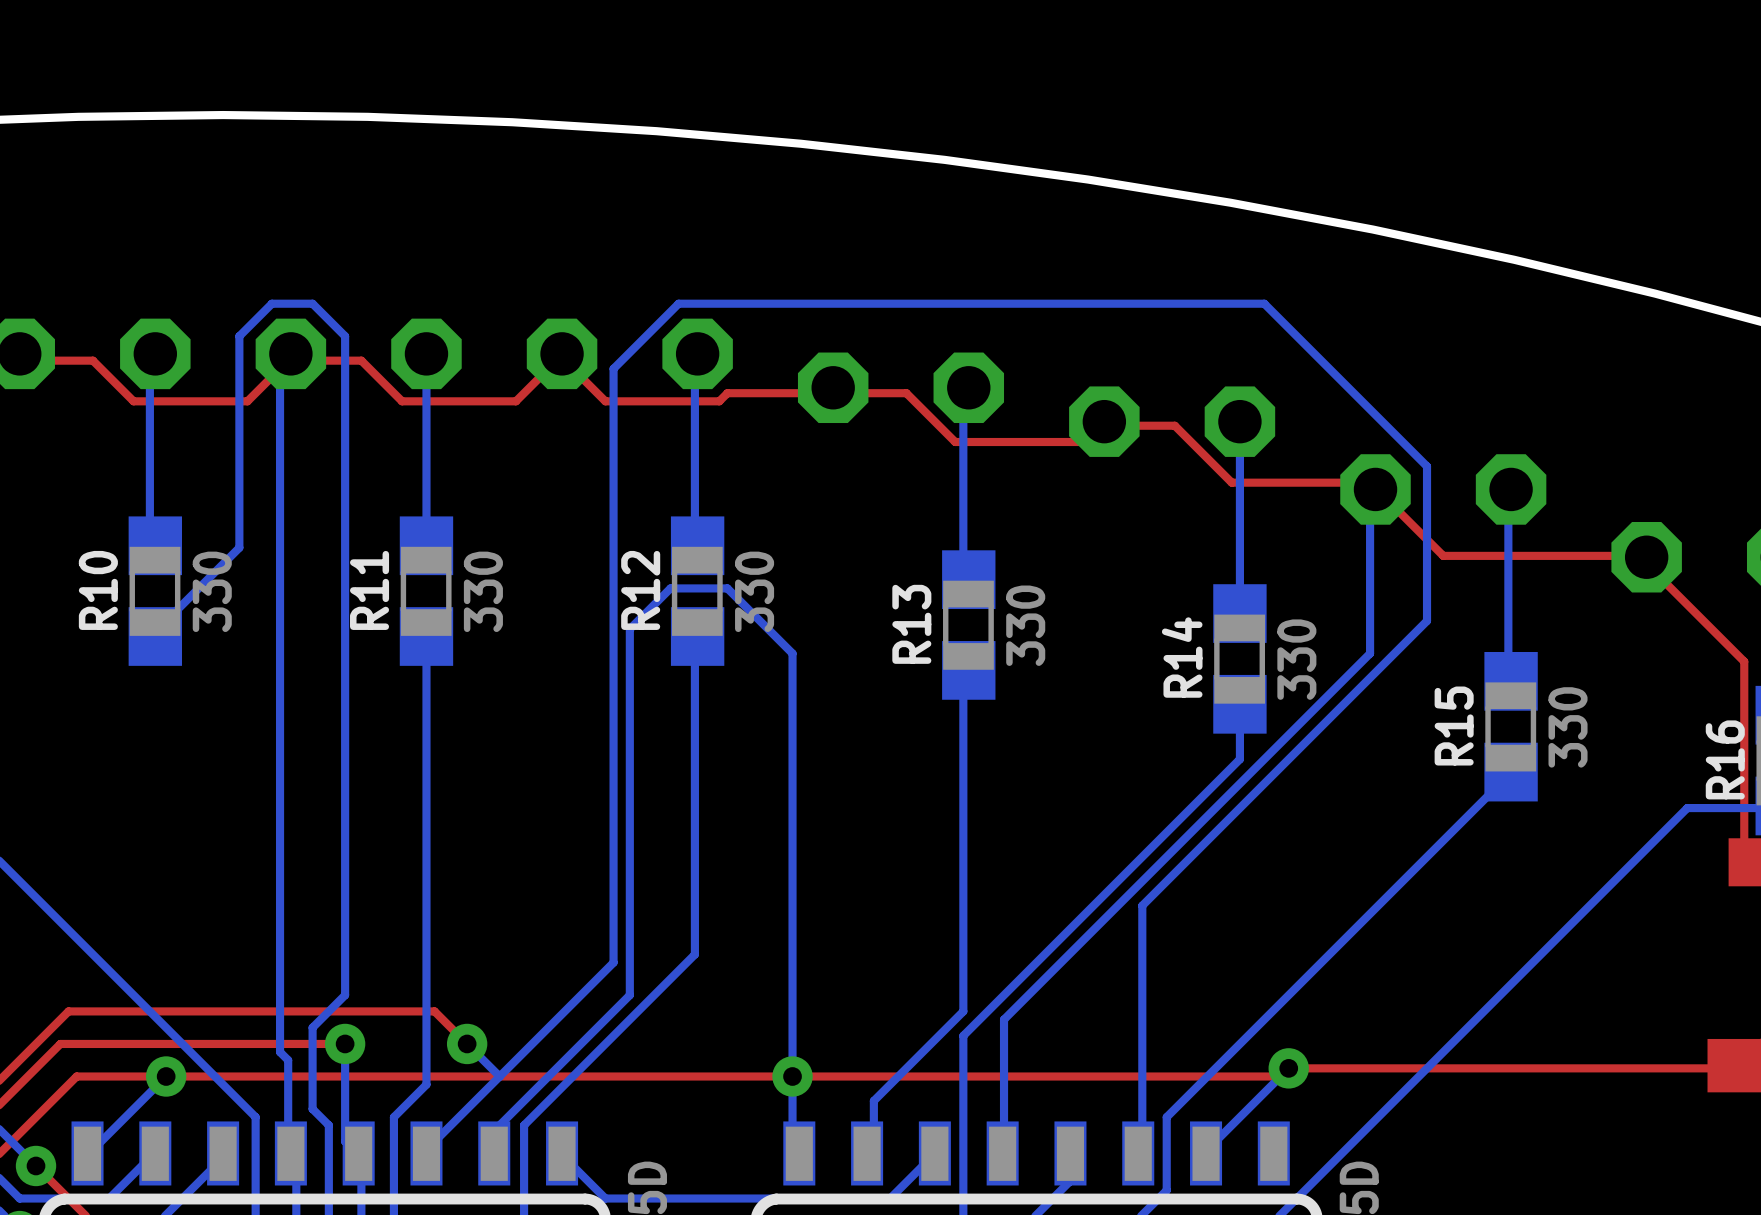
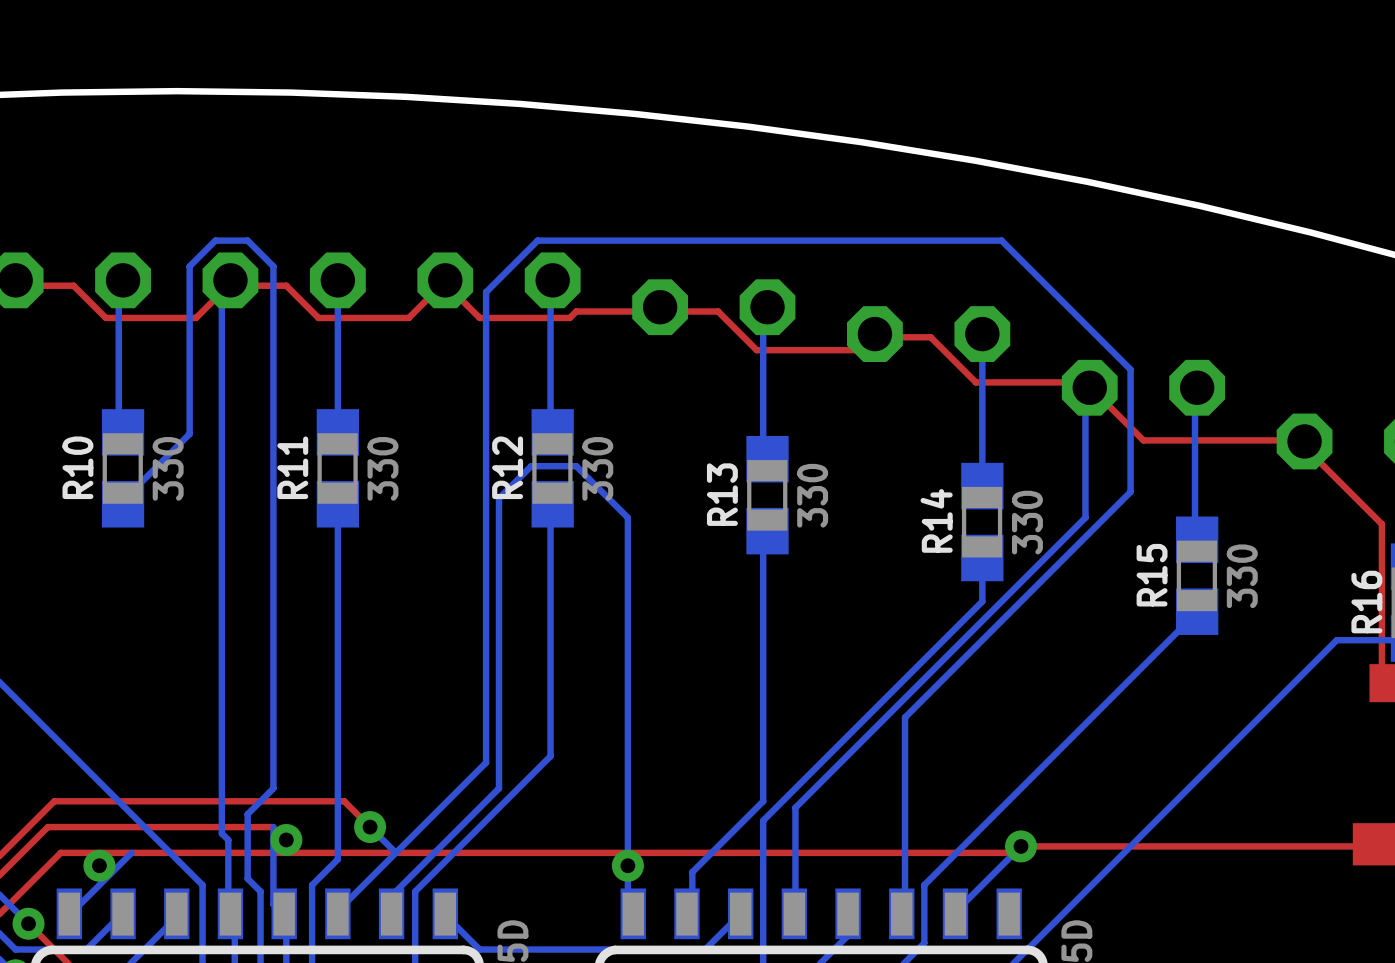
via position: (345, 1043) -> (286, 839)
via position: (166, 1076) -> (99, 865)
via position: (792, 1076) -> (627, 865)

